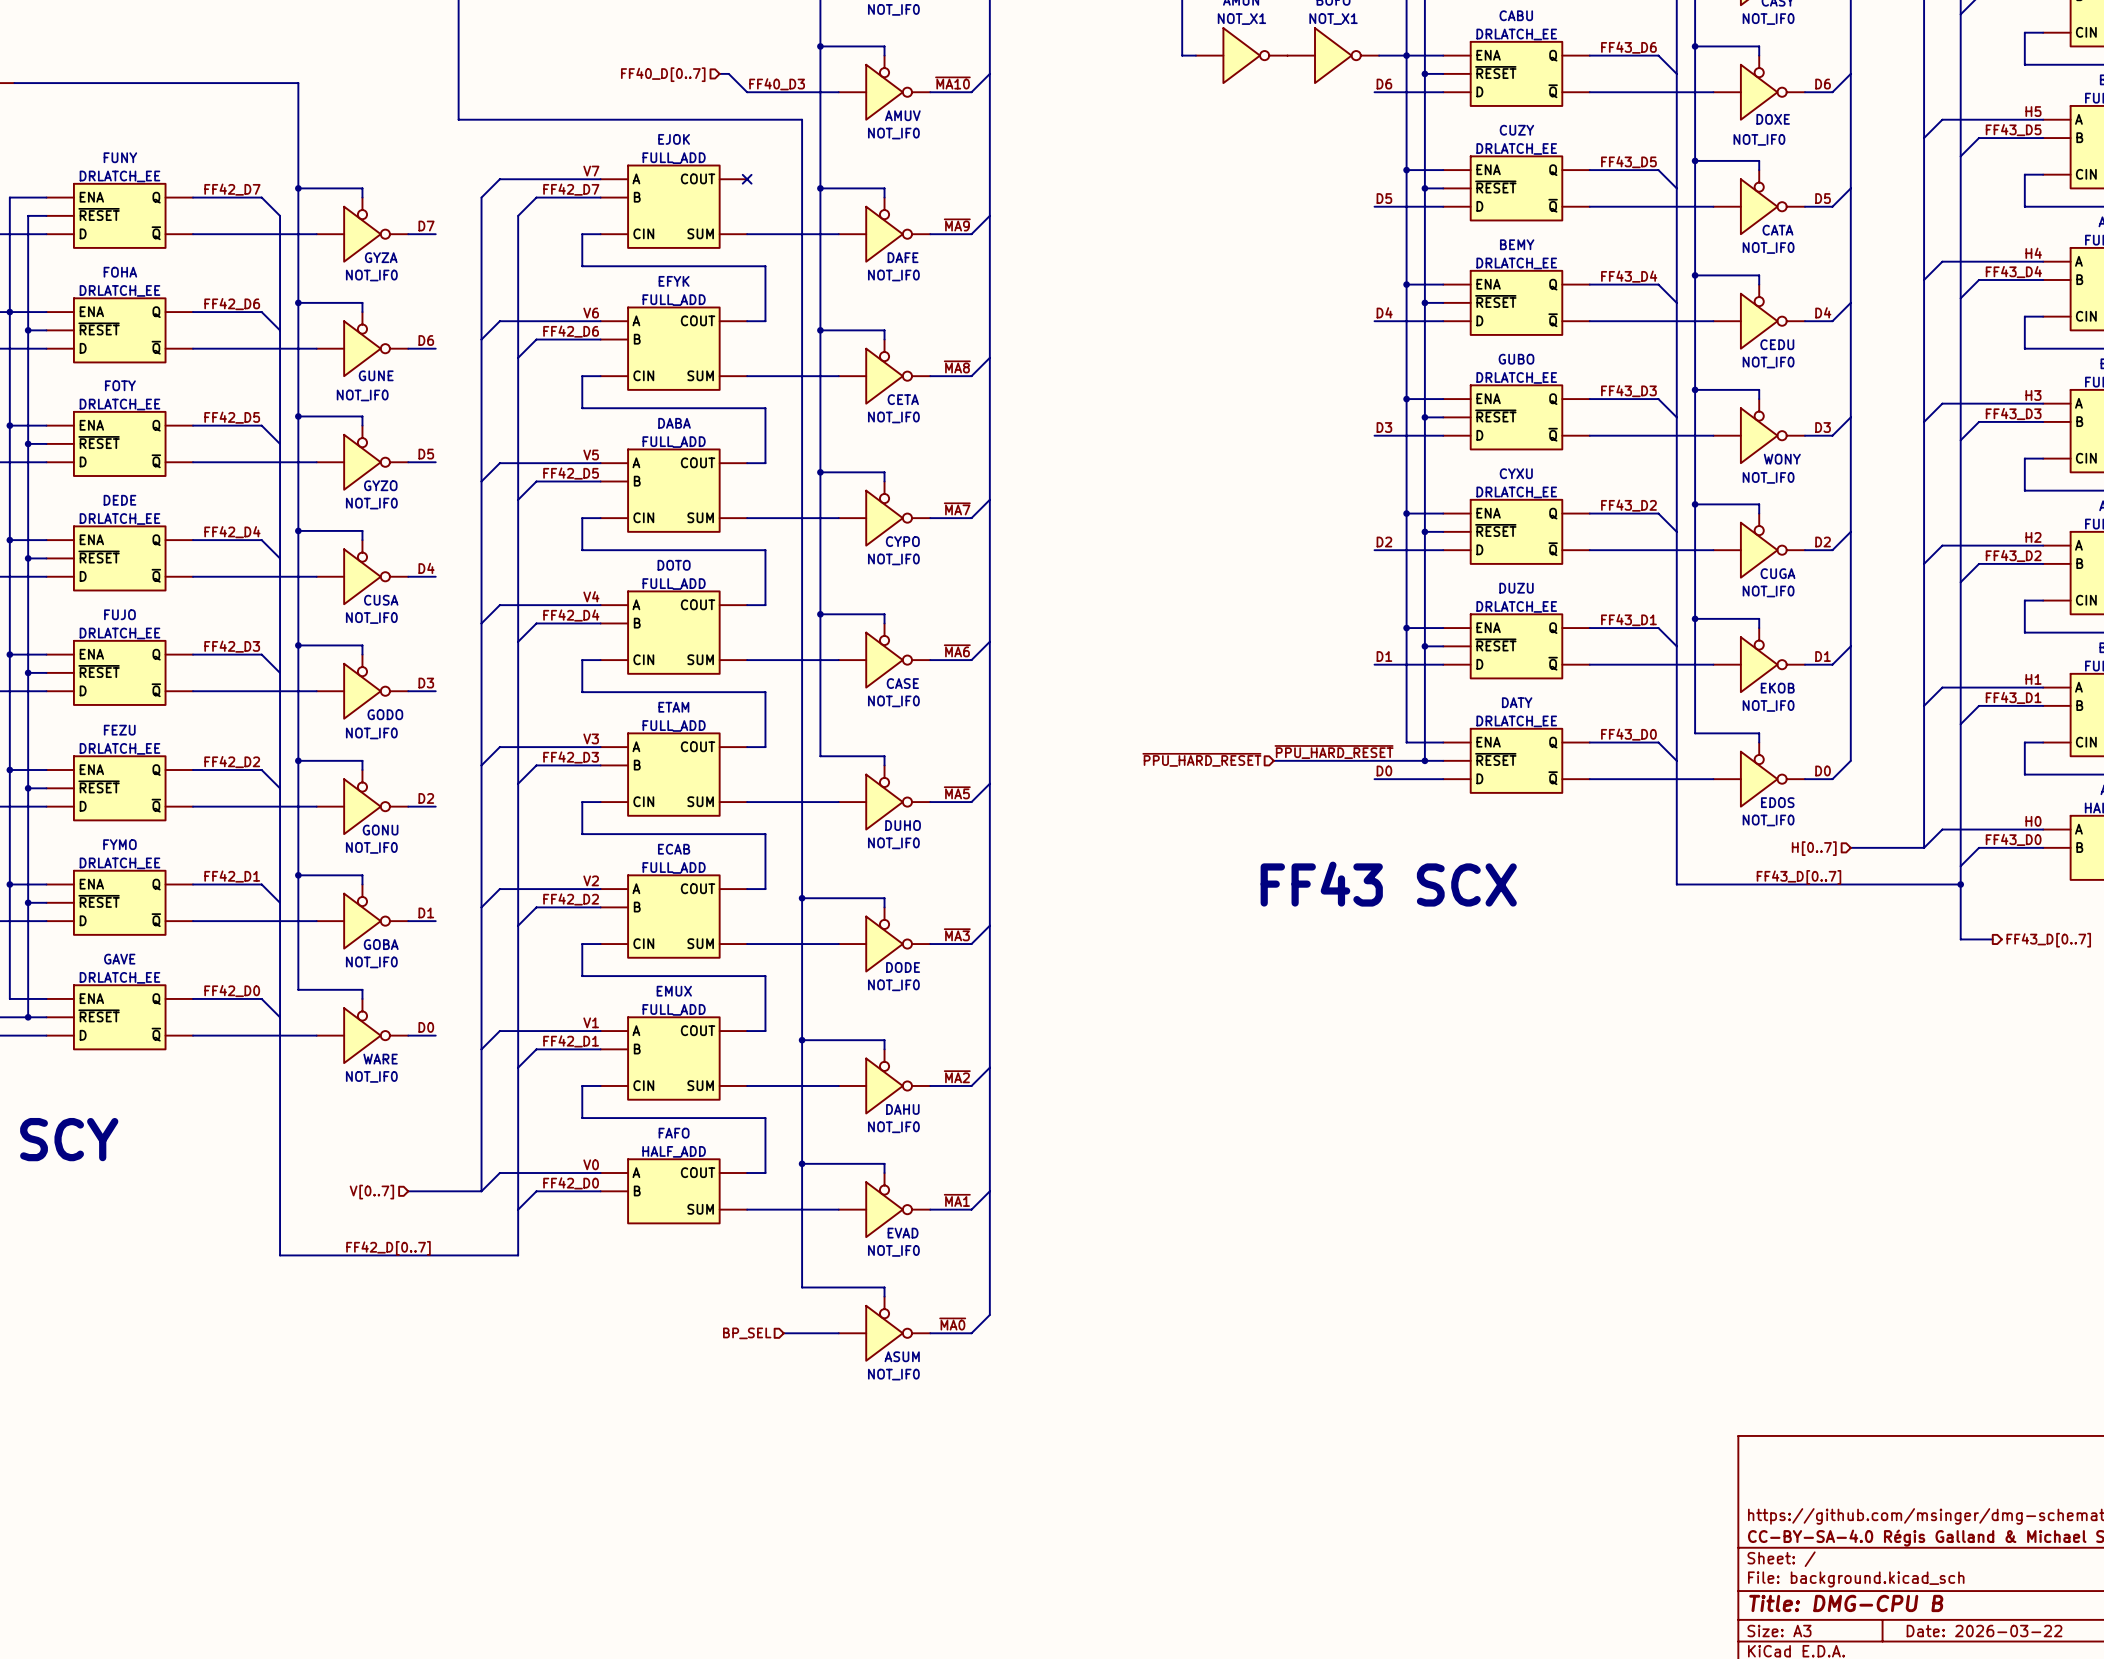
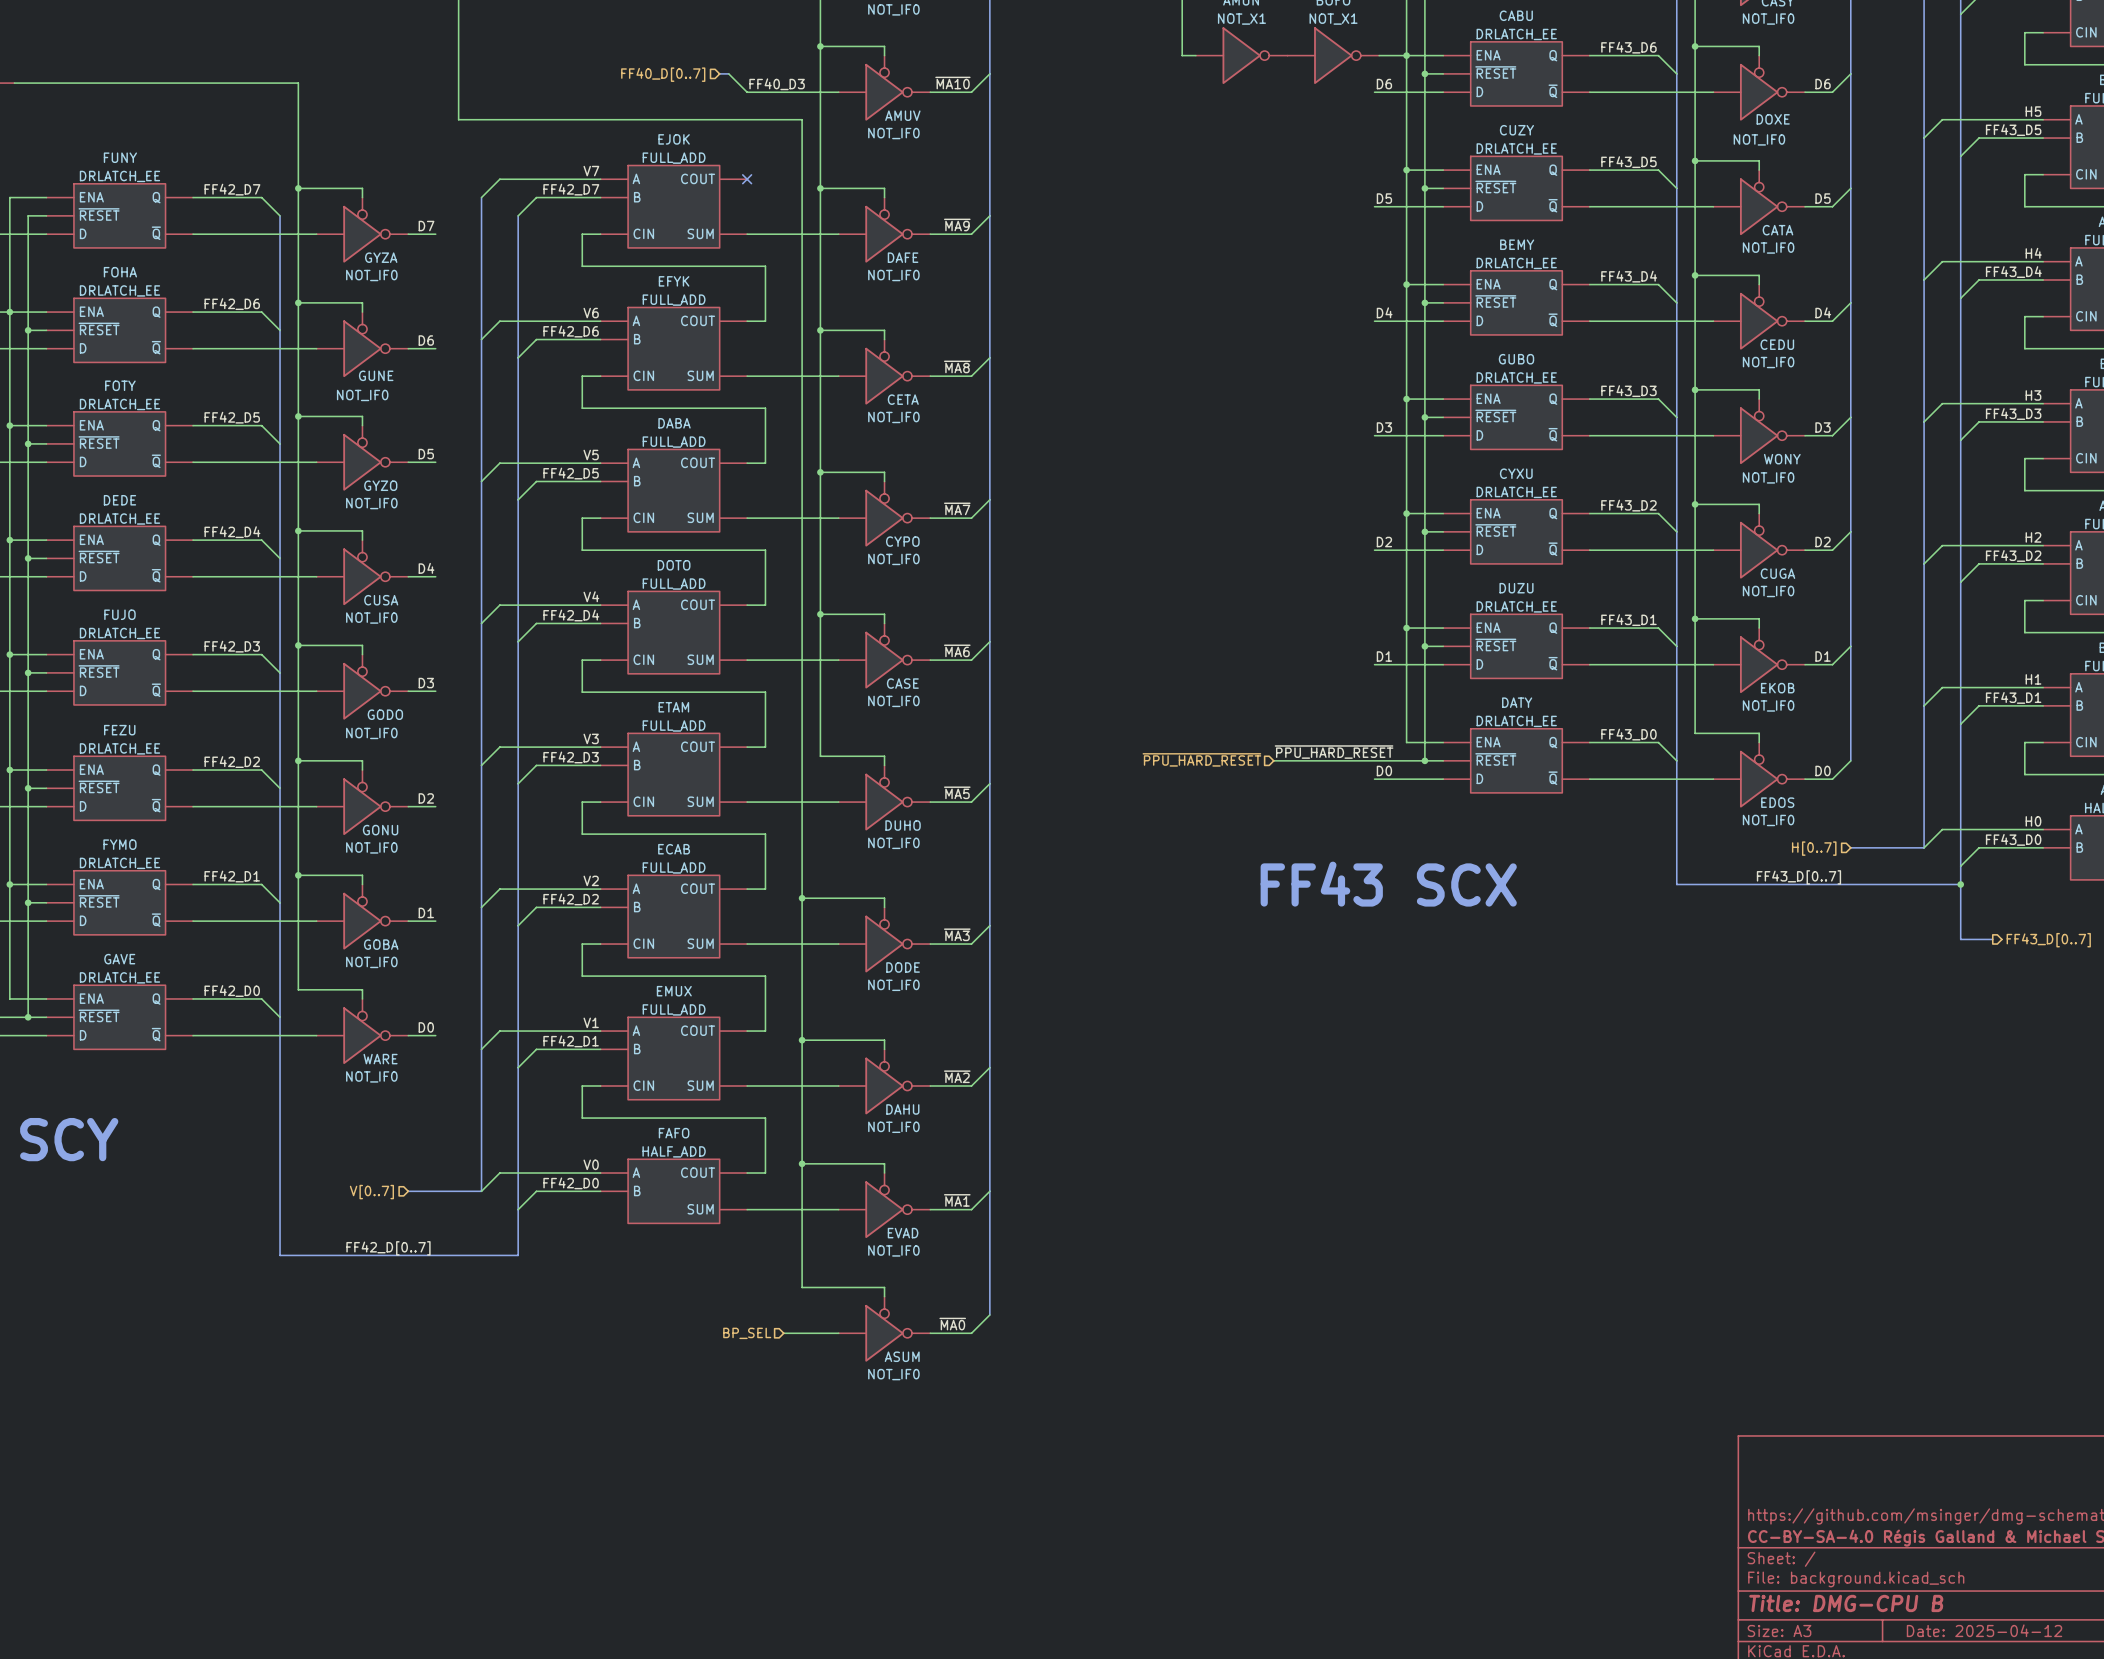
title block: Date: 2026-03-22 (1984, 1631) -> Date: 2025-04-12 (1984, 1630)

